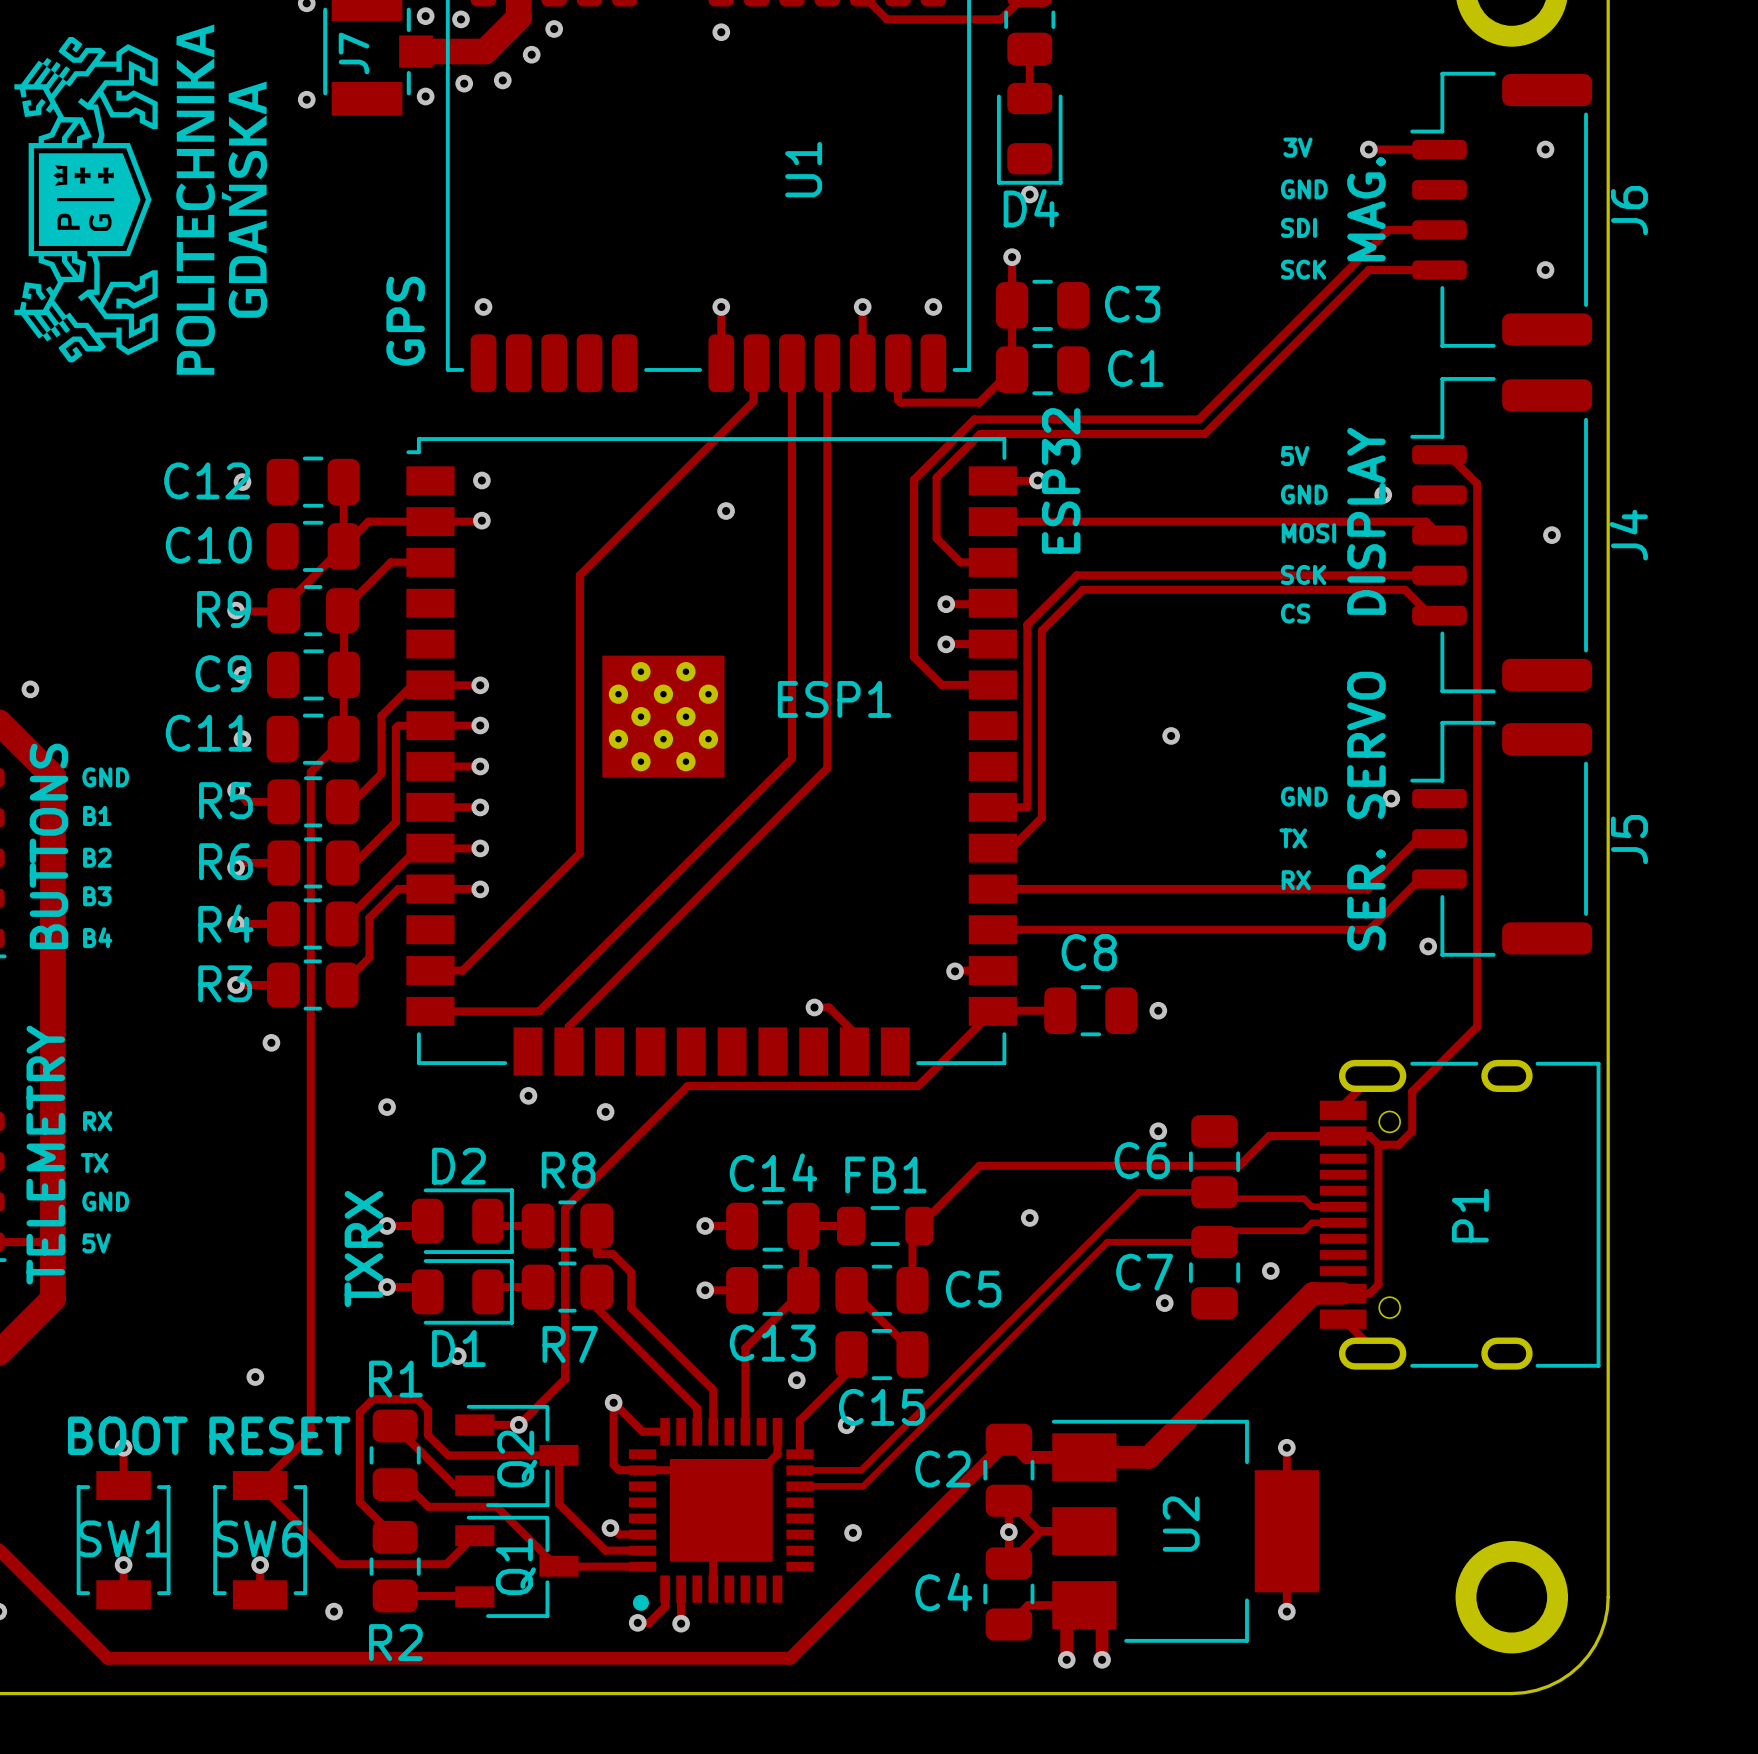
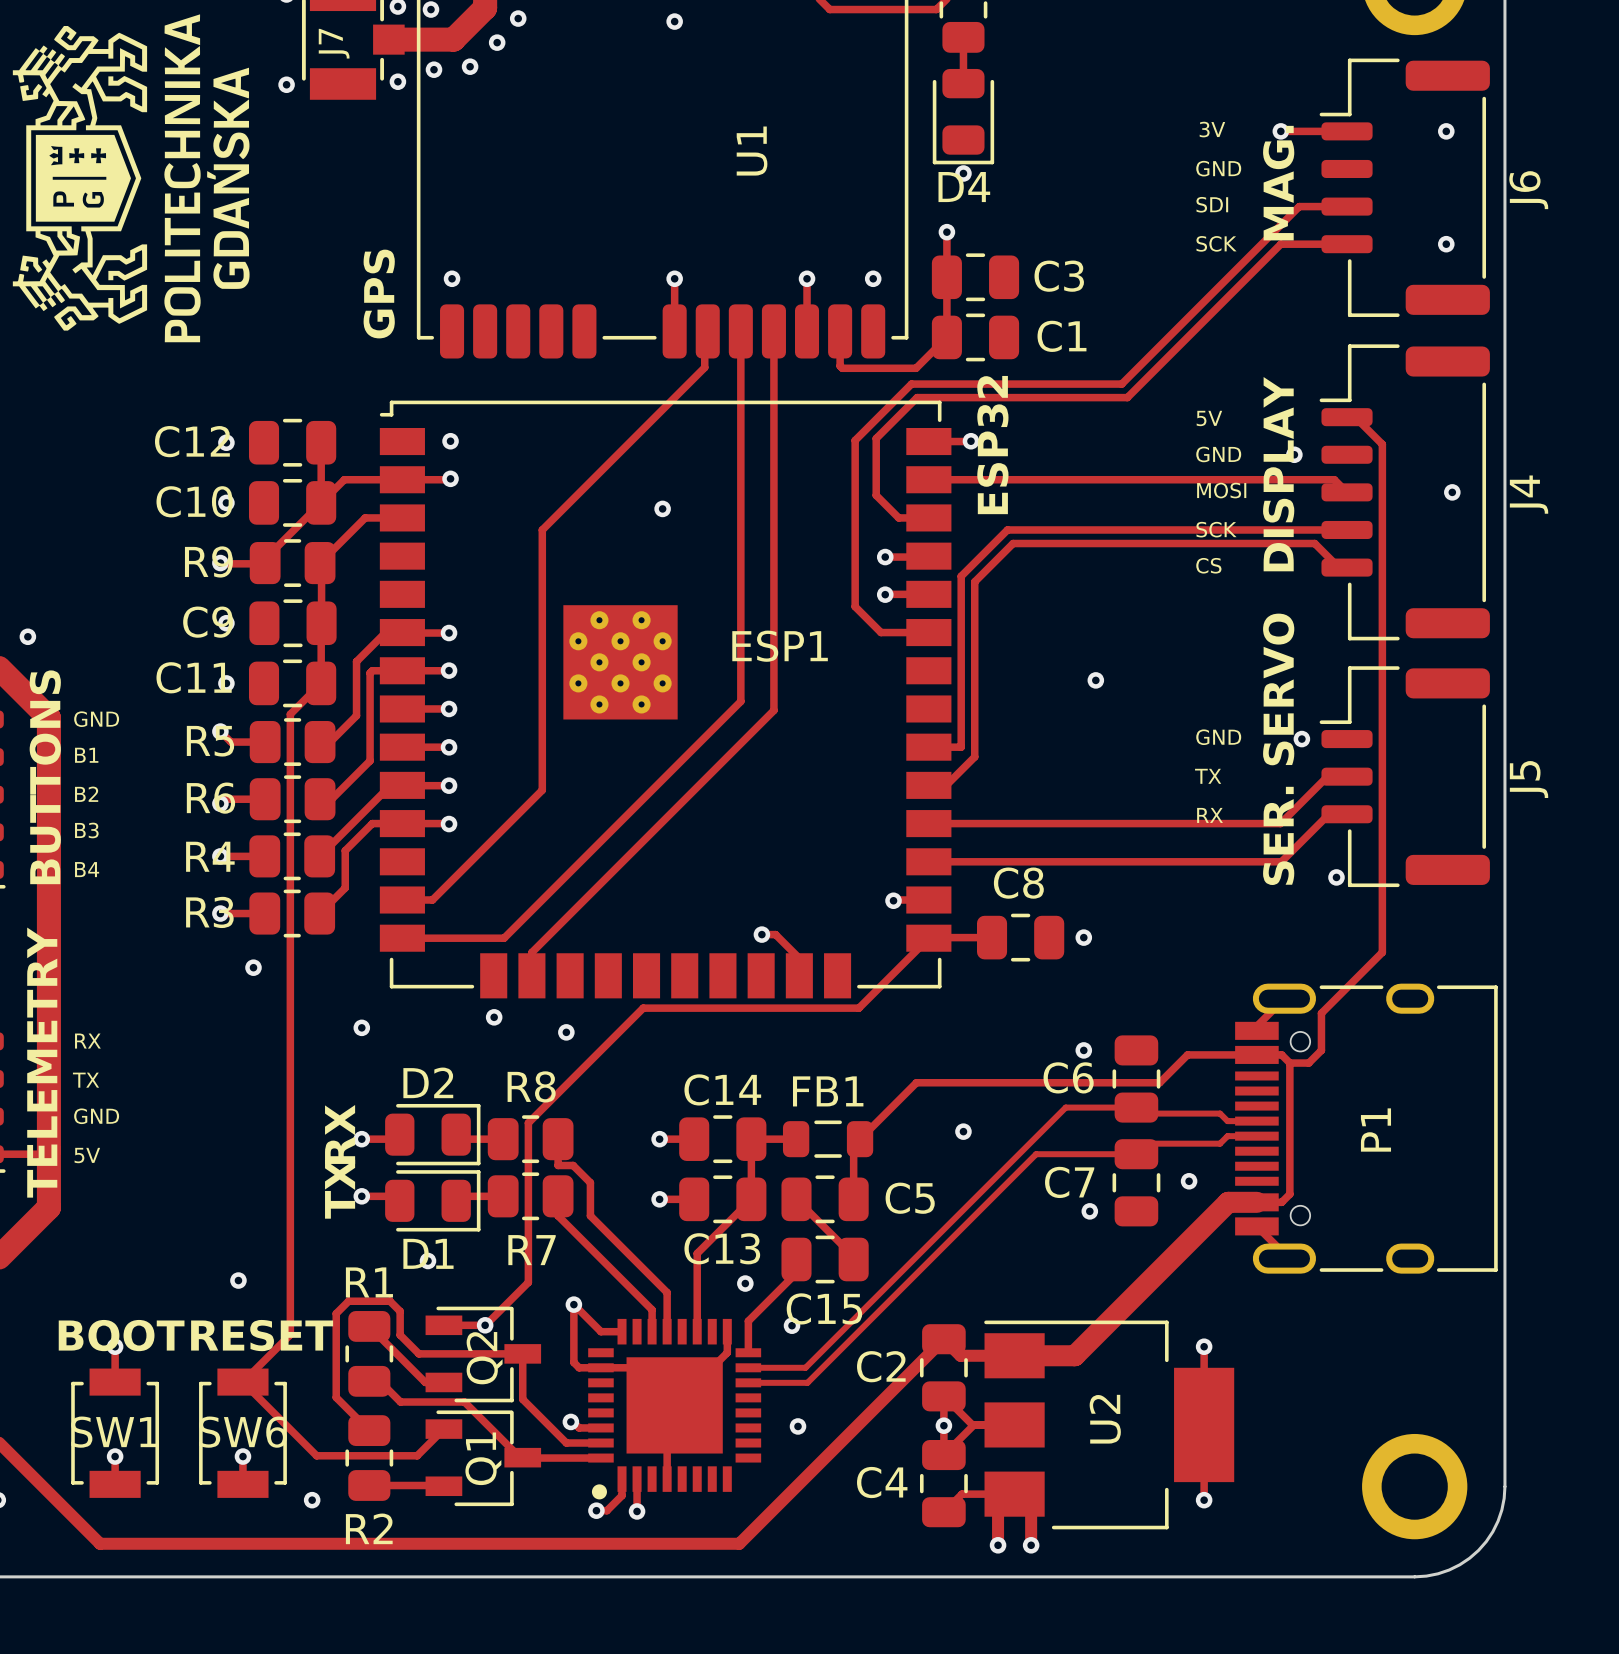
via position: (726, 511) -> (662, 508)
via: none -> (226, 502)

